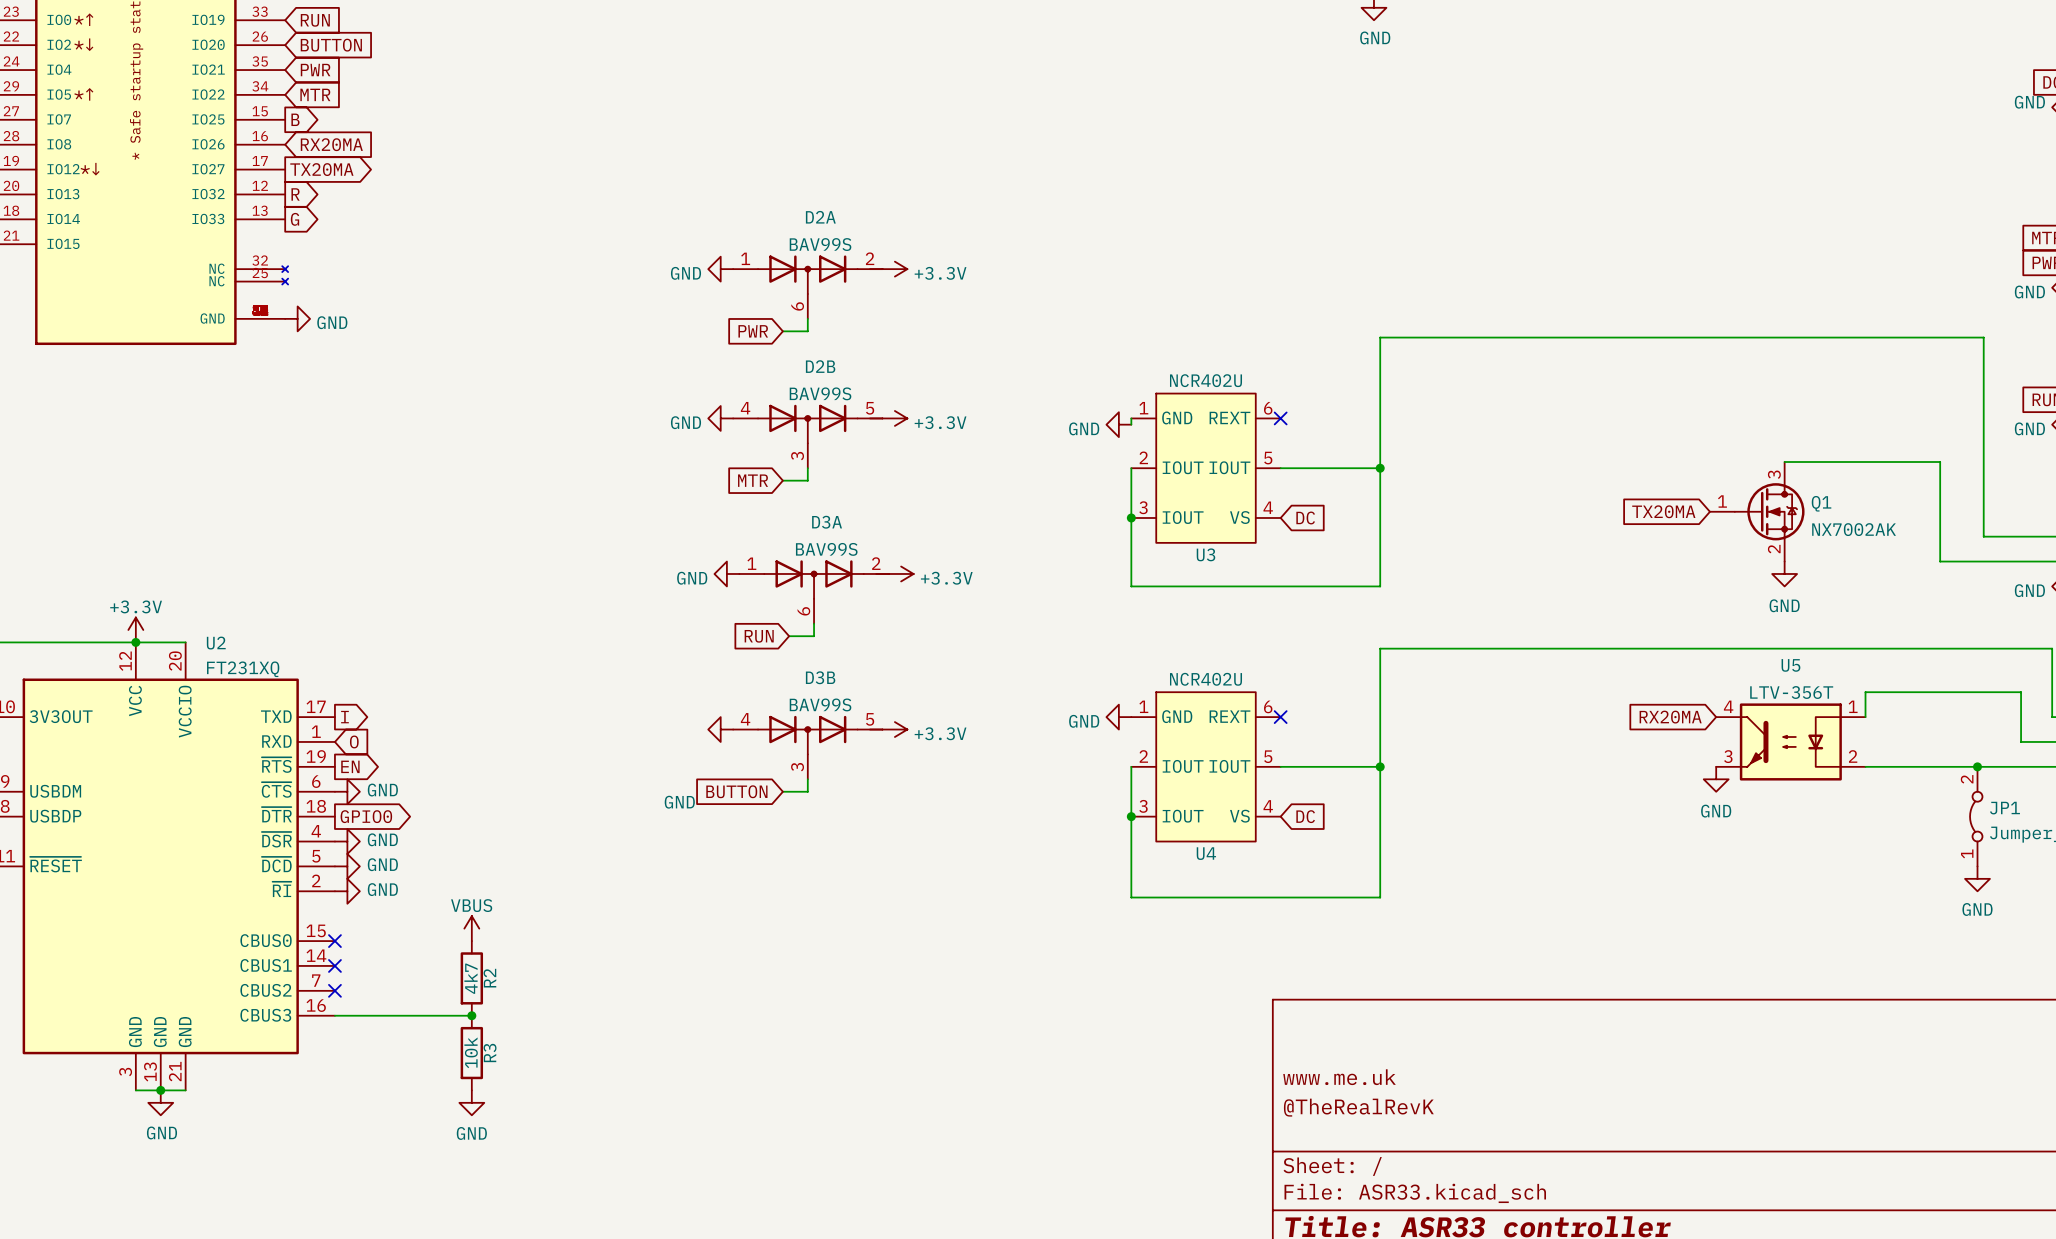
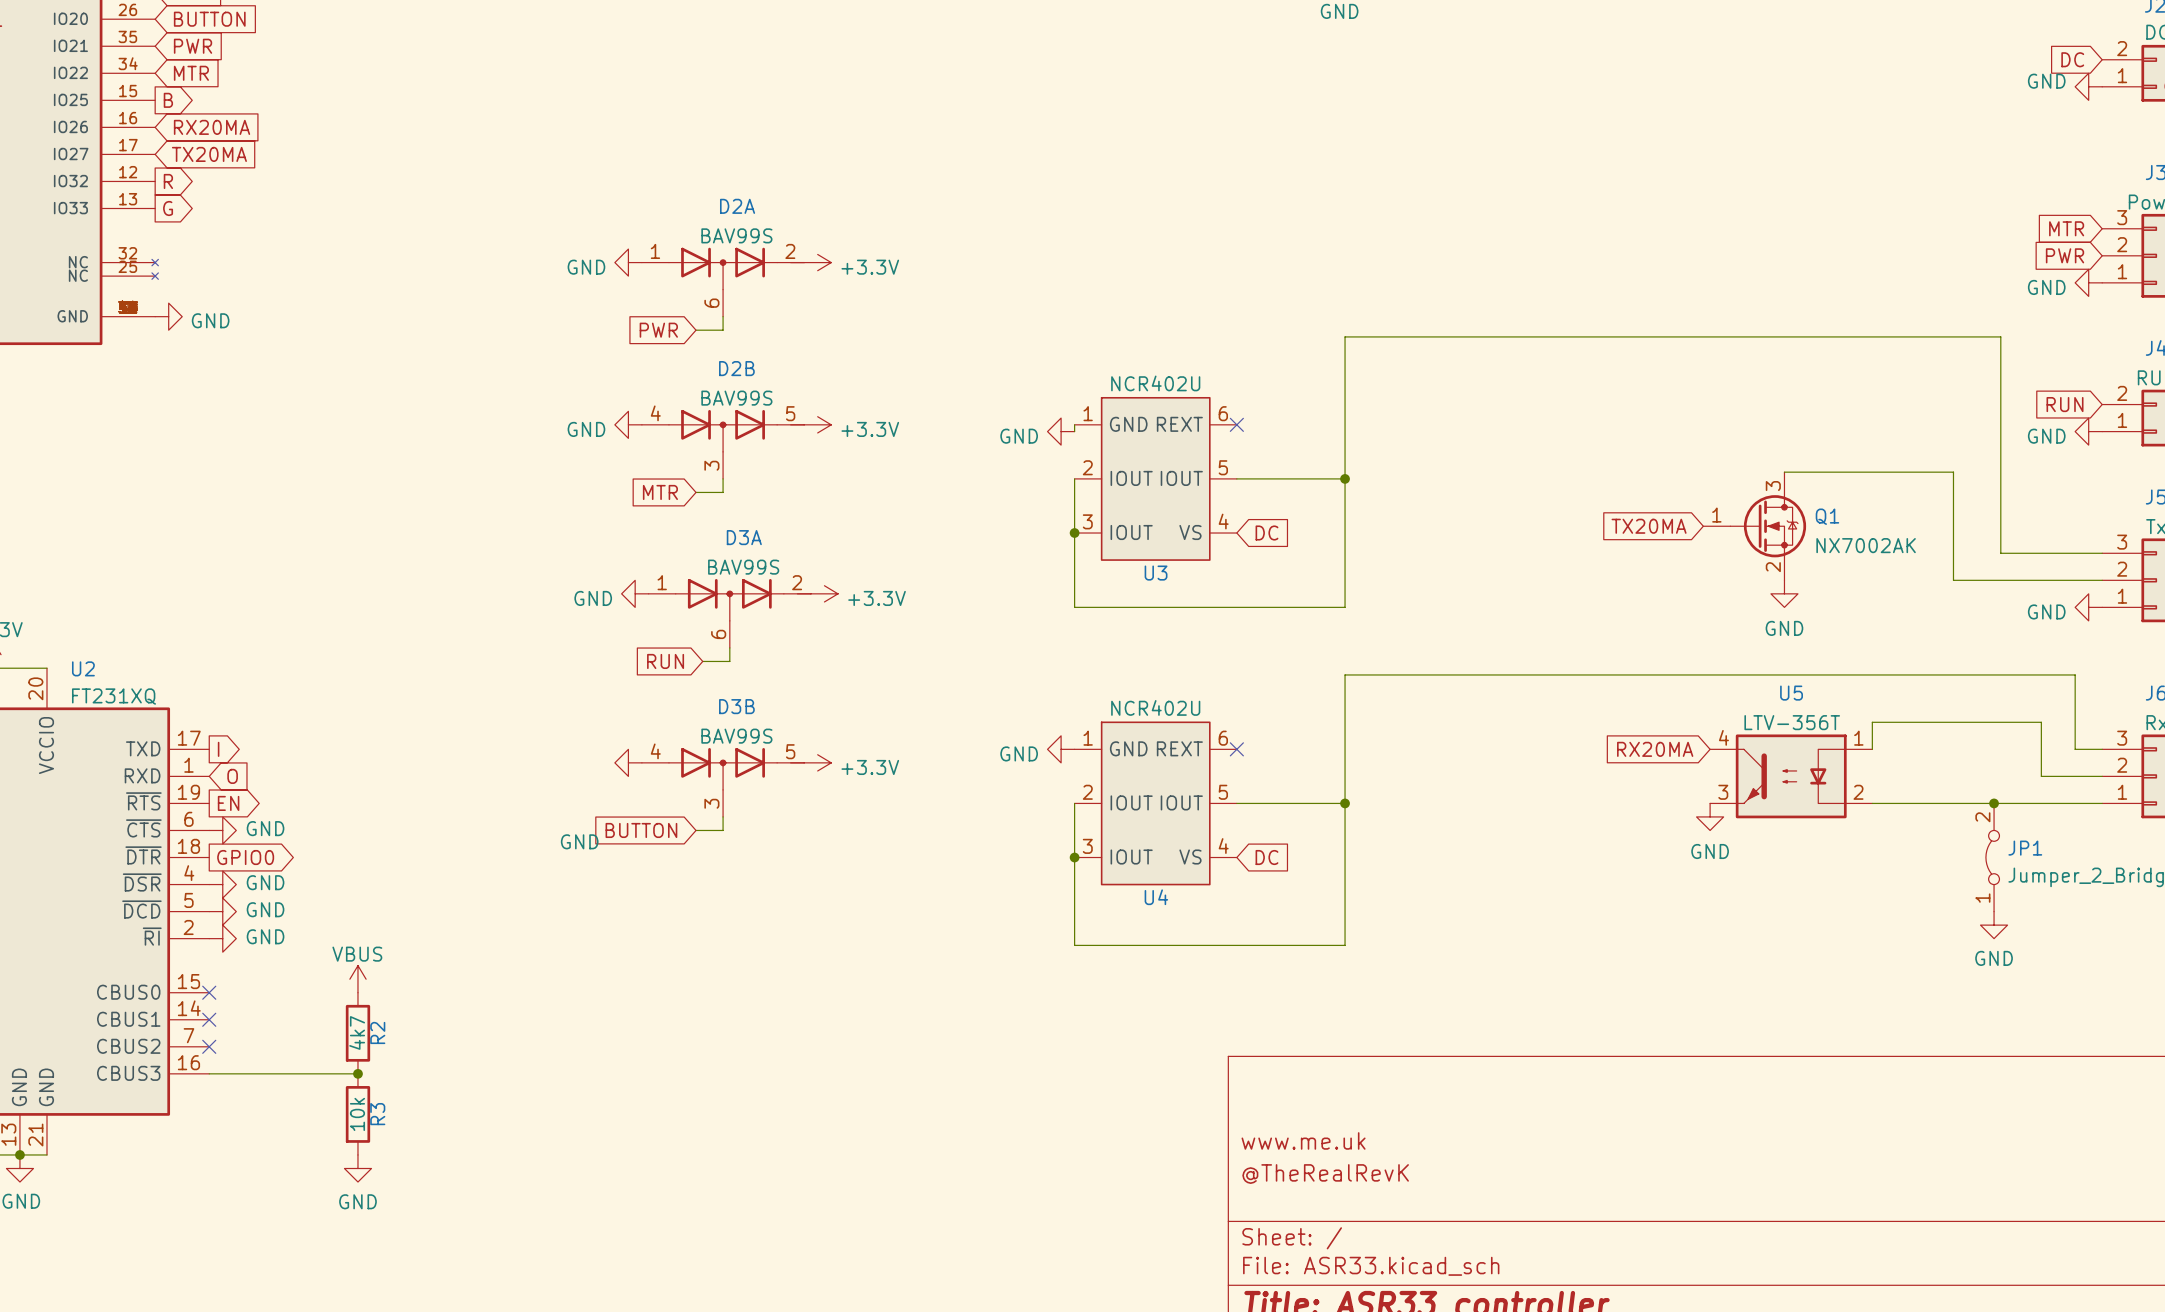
global label shape: output (321, 169) -> input (209, 154)

